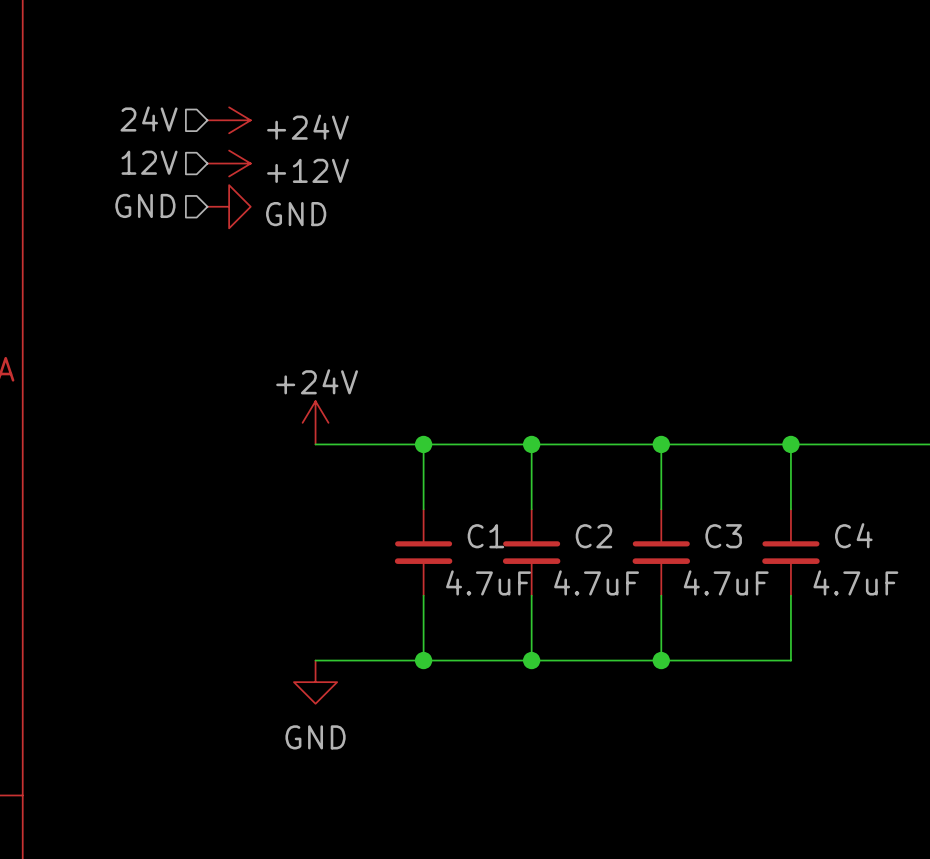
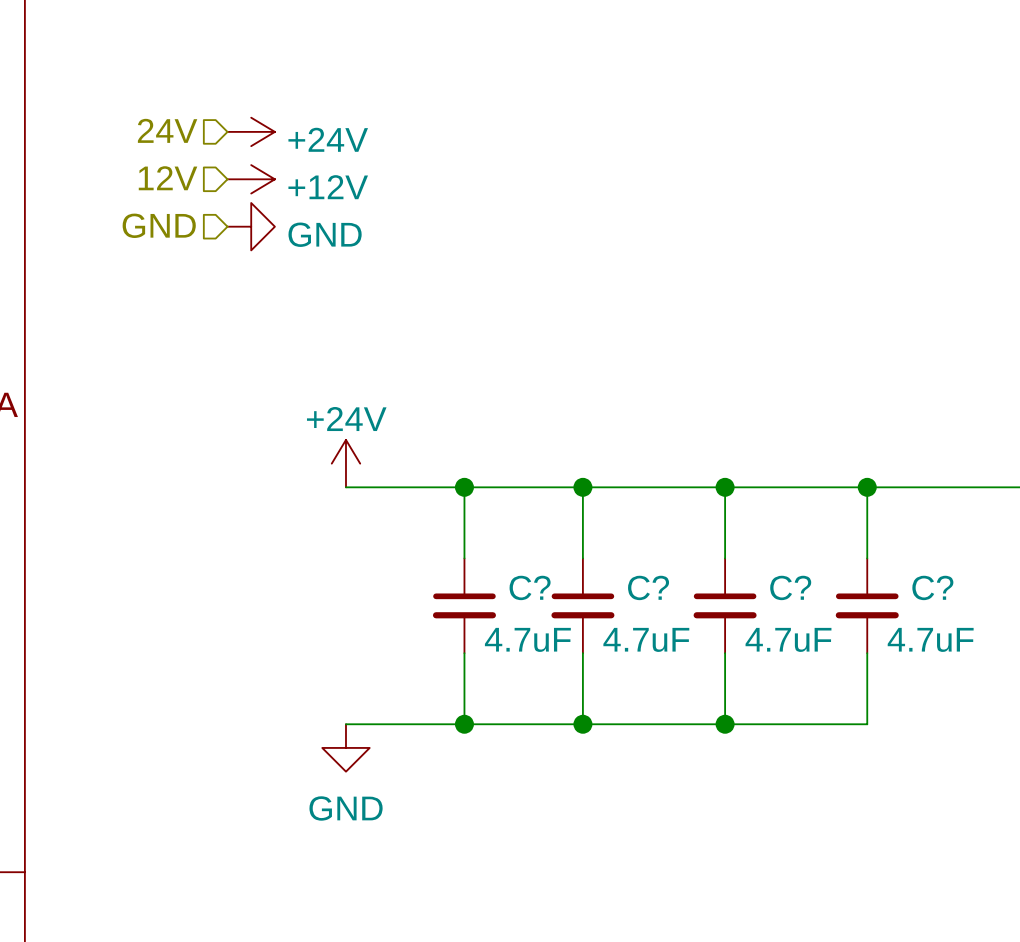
C4 name: C4 (853, 535) -> C? (932, 587)
C1 name: C1 (485, 536) -> C? (530, 587)
C2 name: C2 (593, 536) -> C? (648, 587)
C3 name: C3 (723, 536) -> C? (790, 587)

